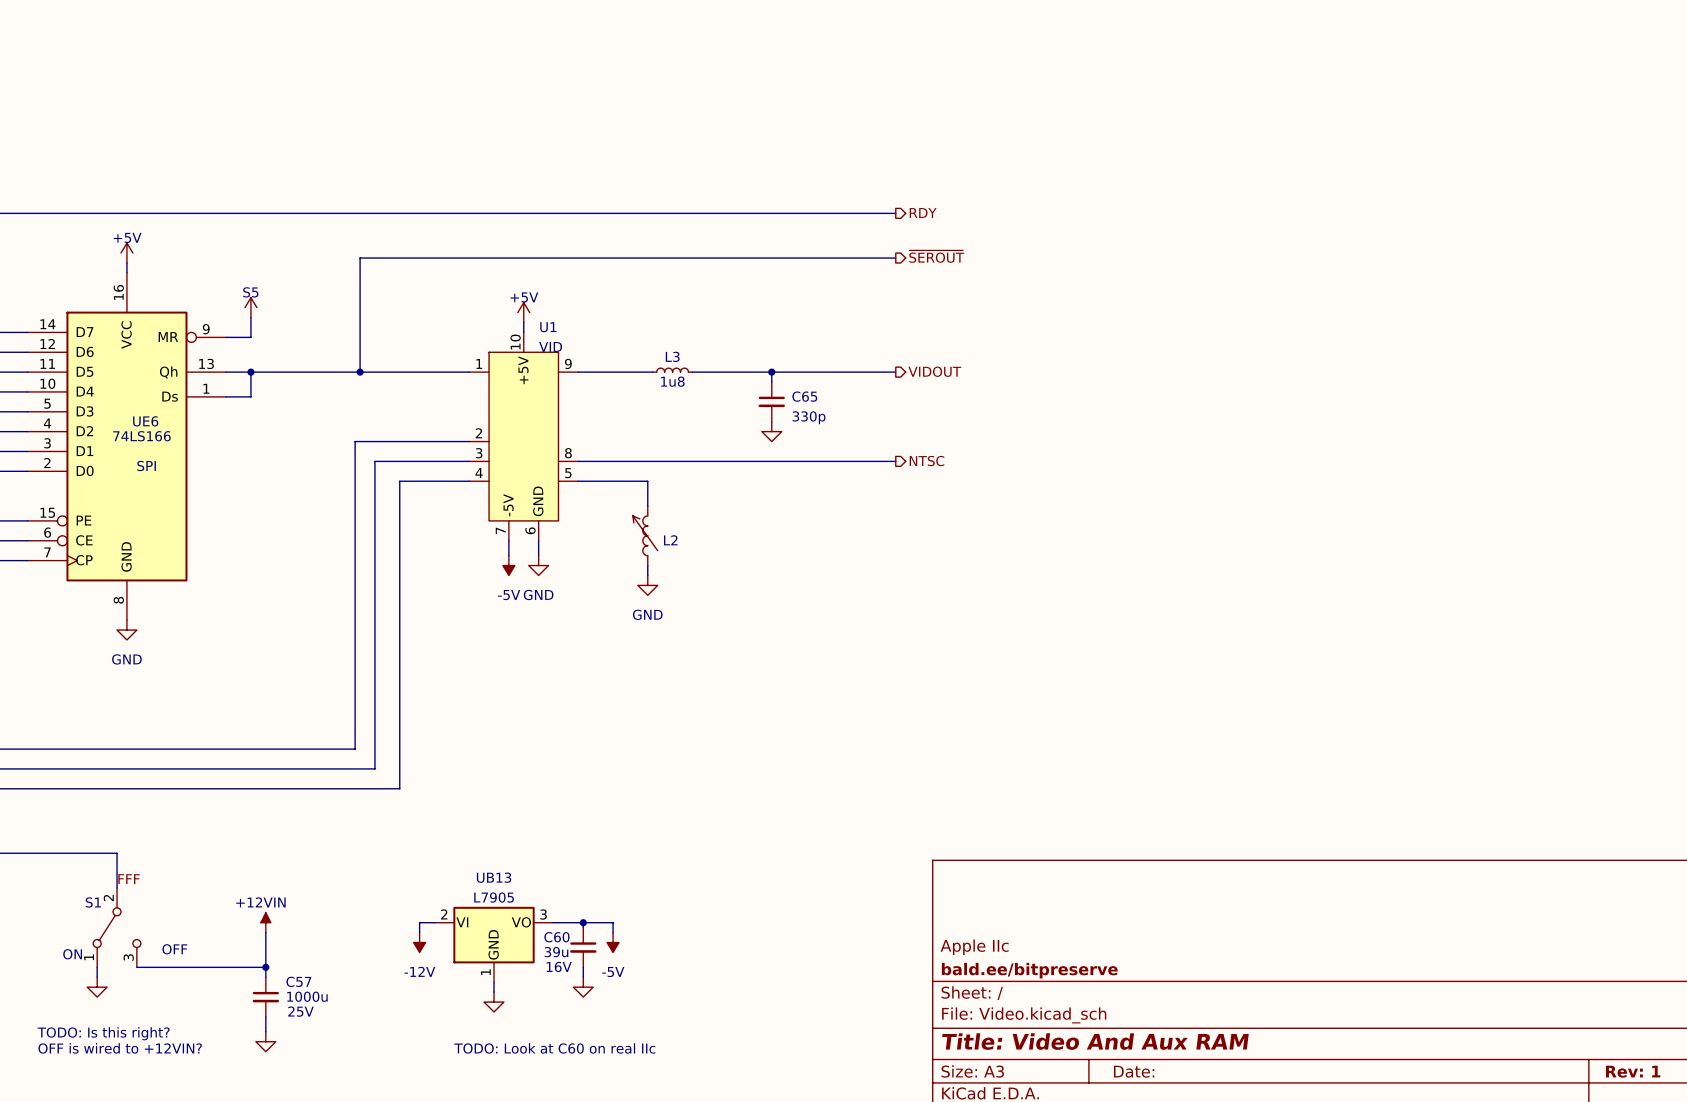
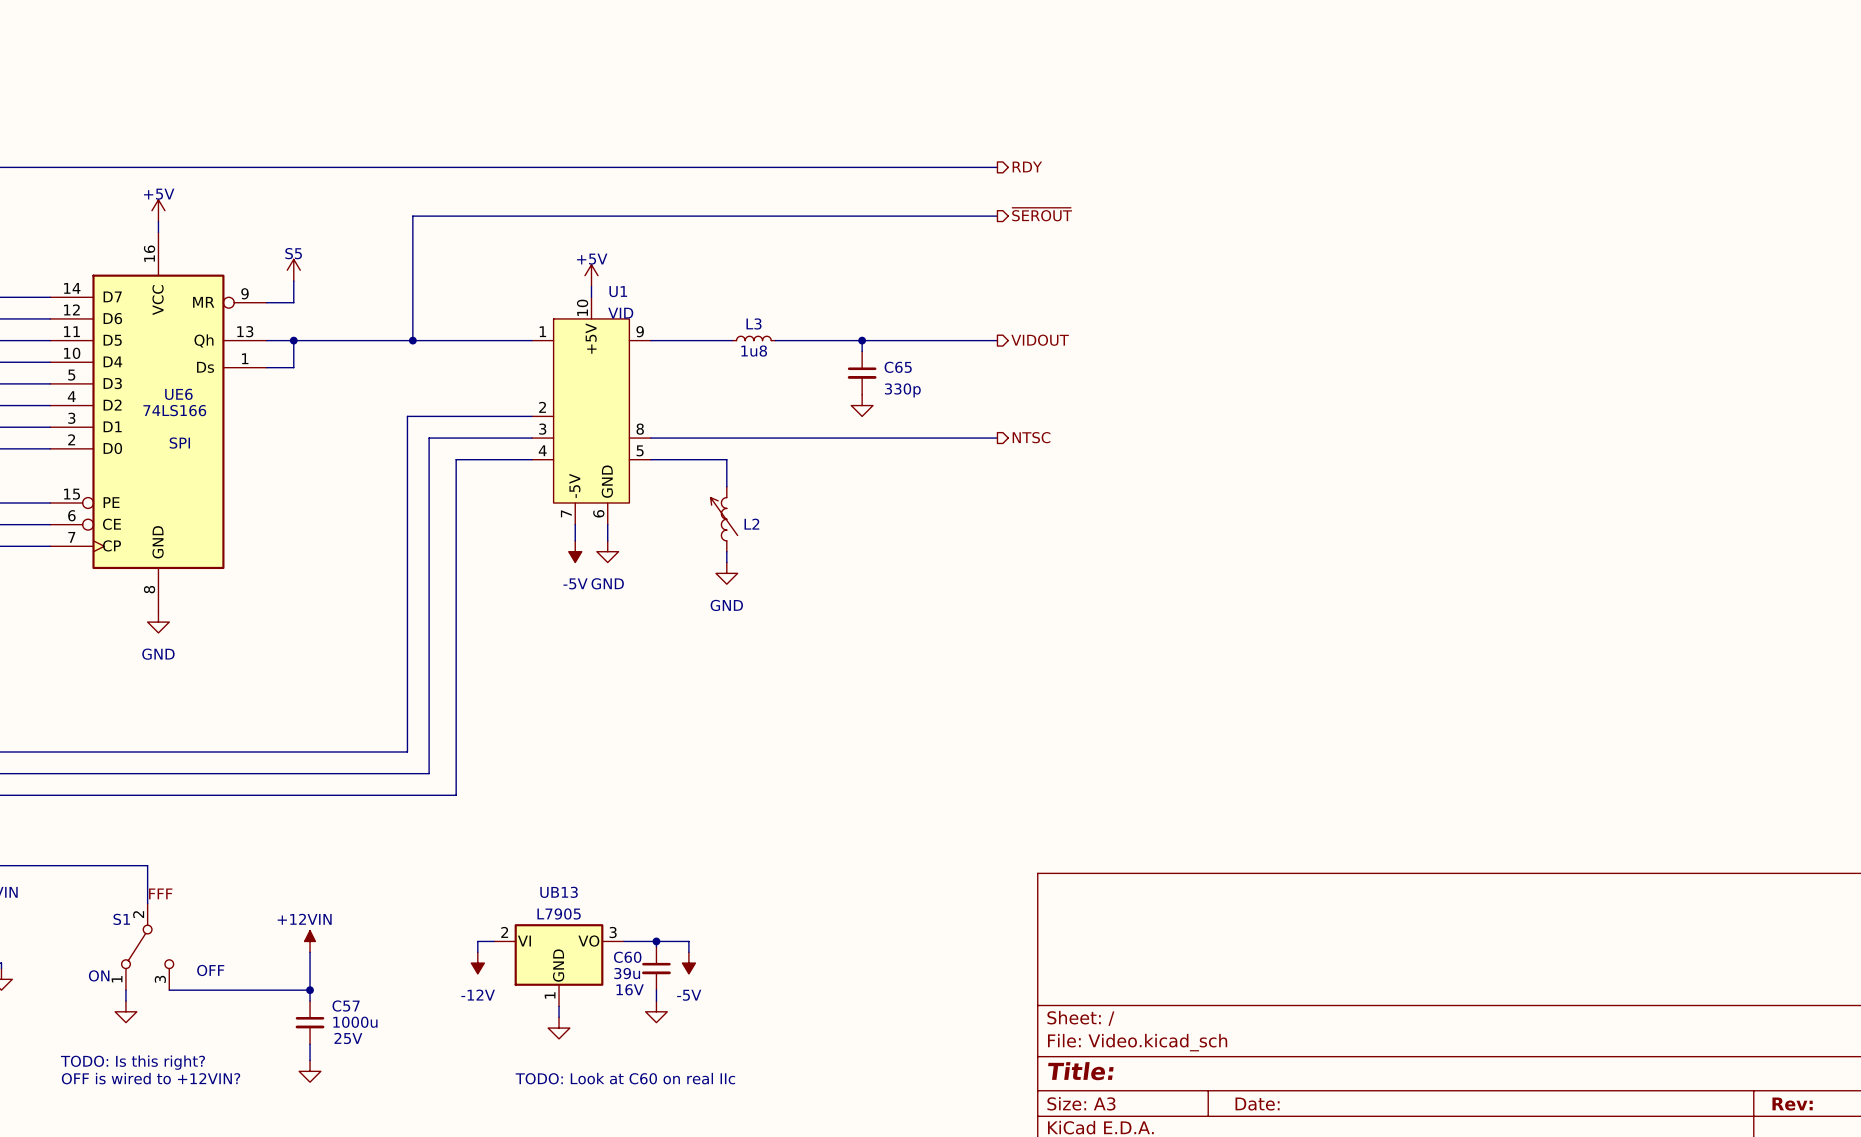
title block: Apple IIc (974, 947) -> none
title block: bald.ee/bitpreserve (1029, 970) -> none
title block: Title: Video And Aux RAM (1095, 1041) -> Title: (1080, 1071)
title block: Rev: 1 (1633, 1071) -> Rev: (1792, 1104)

